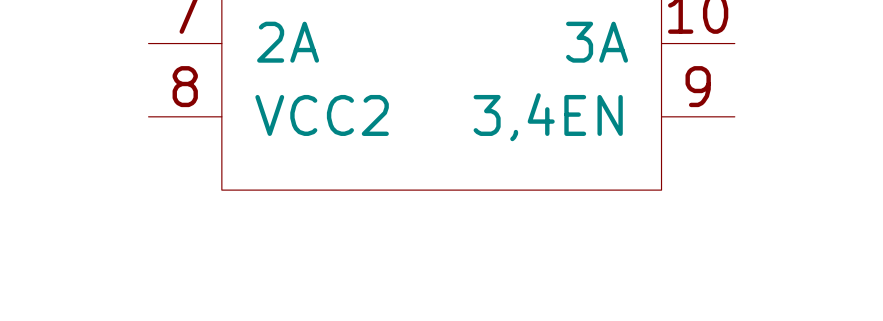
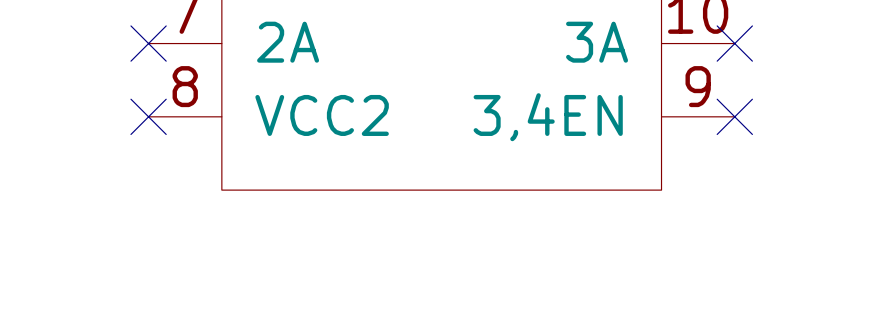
no-connect mark: none -> (148, 43)
no-connect mark: none -> (734, 43)
no-connect mark: none -> (148, 116)
no-connect mark: none -> (734, 116)

